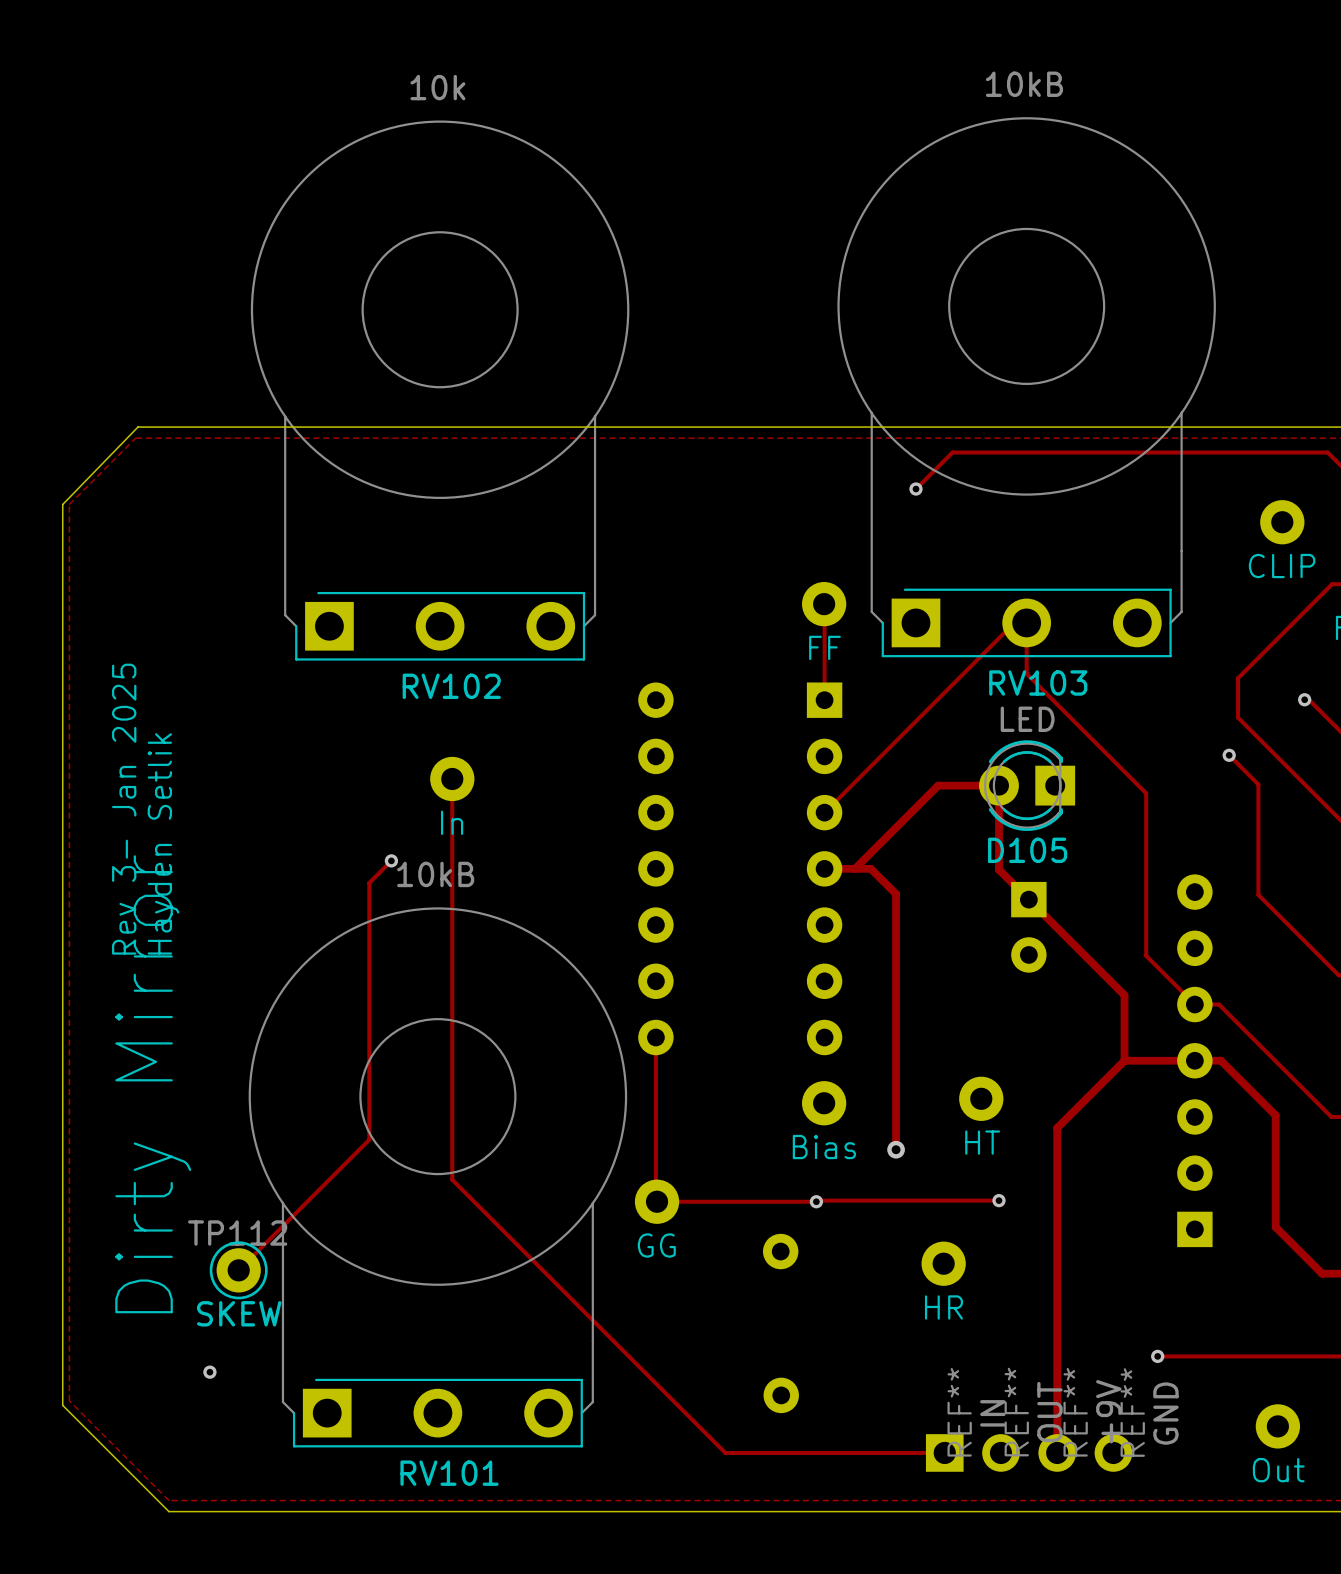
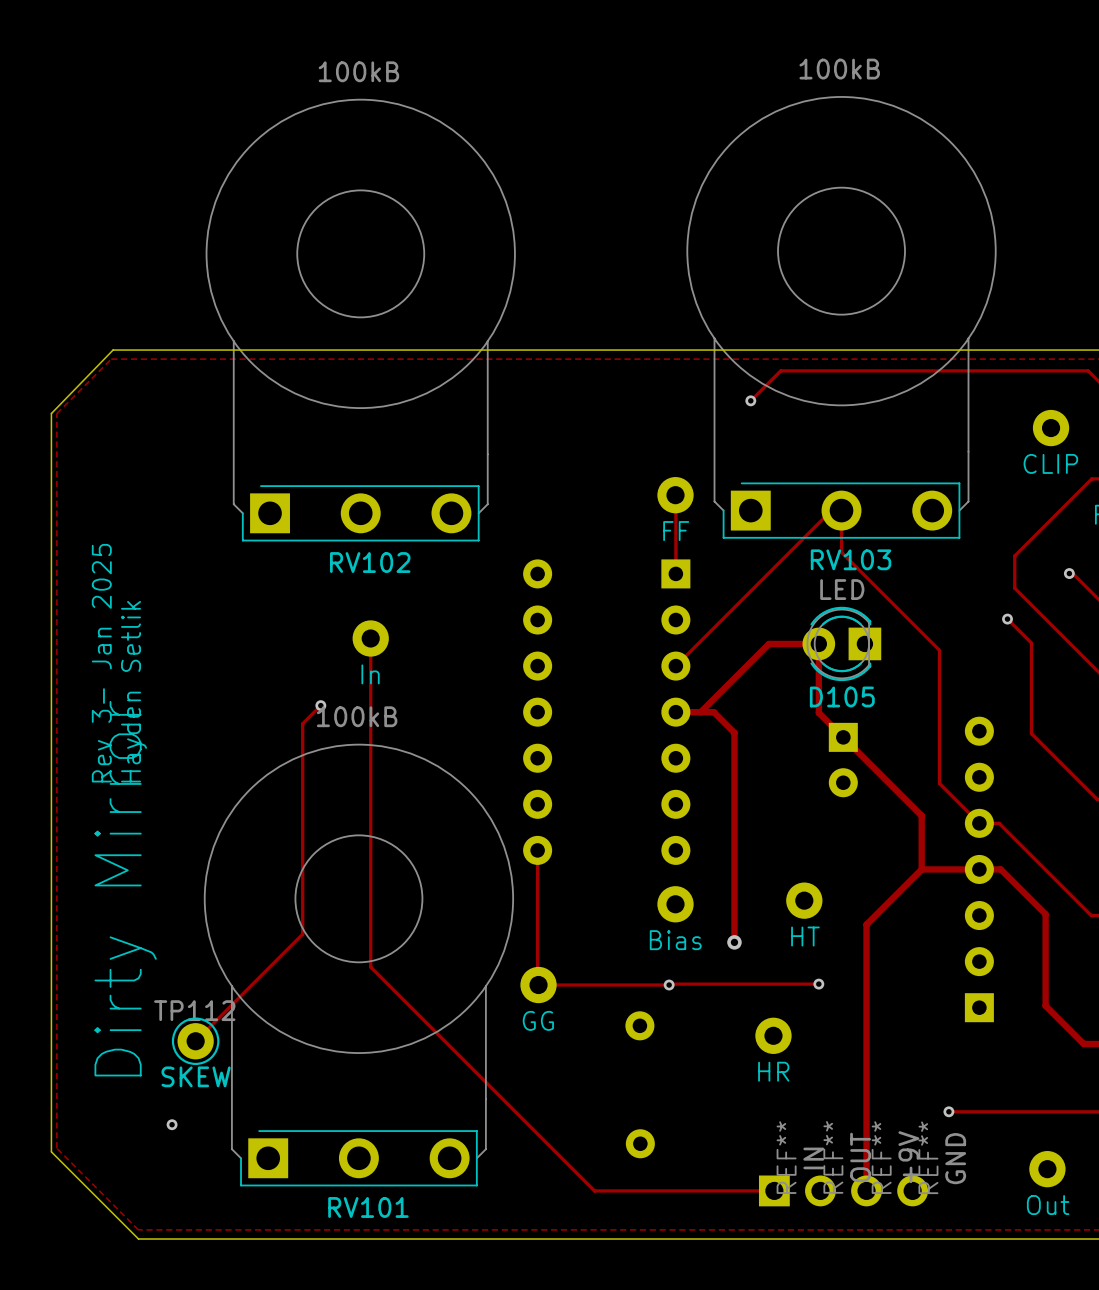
RV103 value: 10kB (1024, 84) -> 100kB (839, 69)
RV102 value: 10k (437, 87) -> 100kB (358, 71)
RV101 value: 10kB (435, 874) -> 100kB (357, 716)

